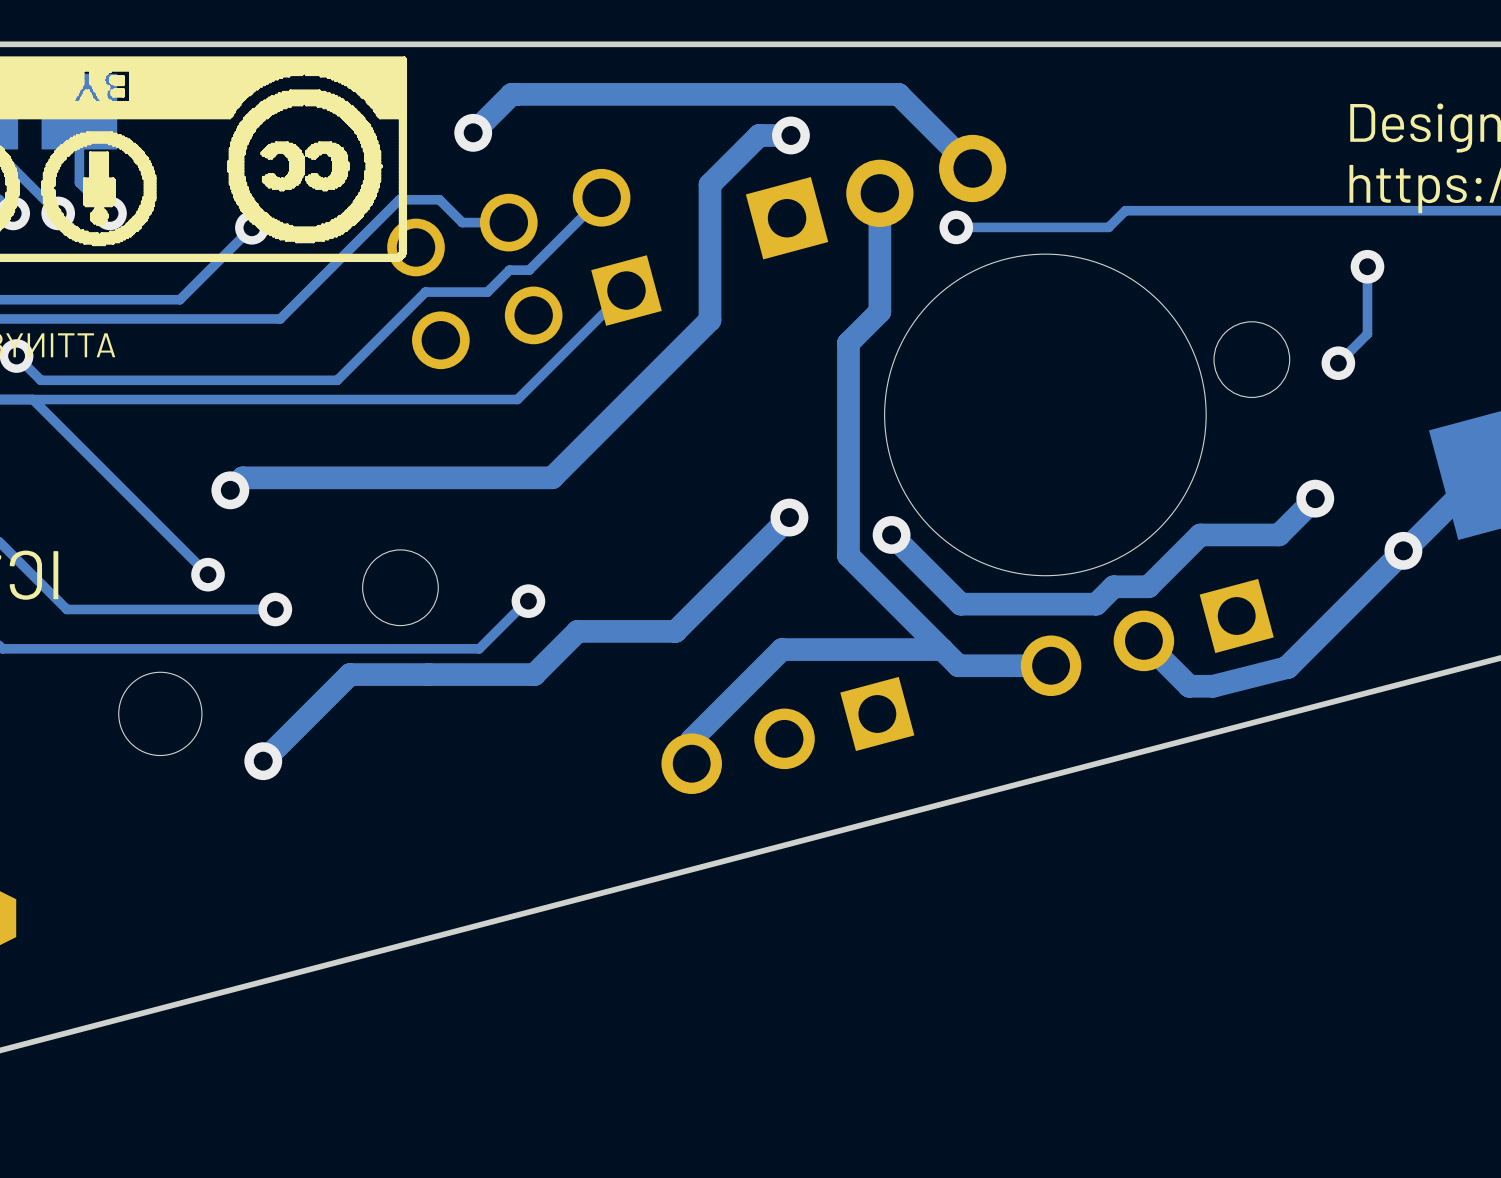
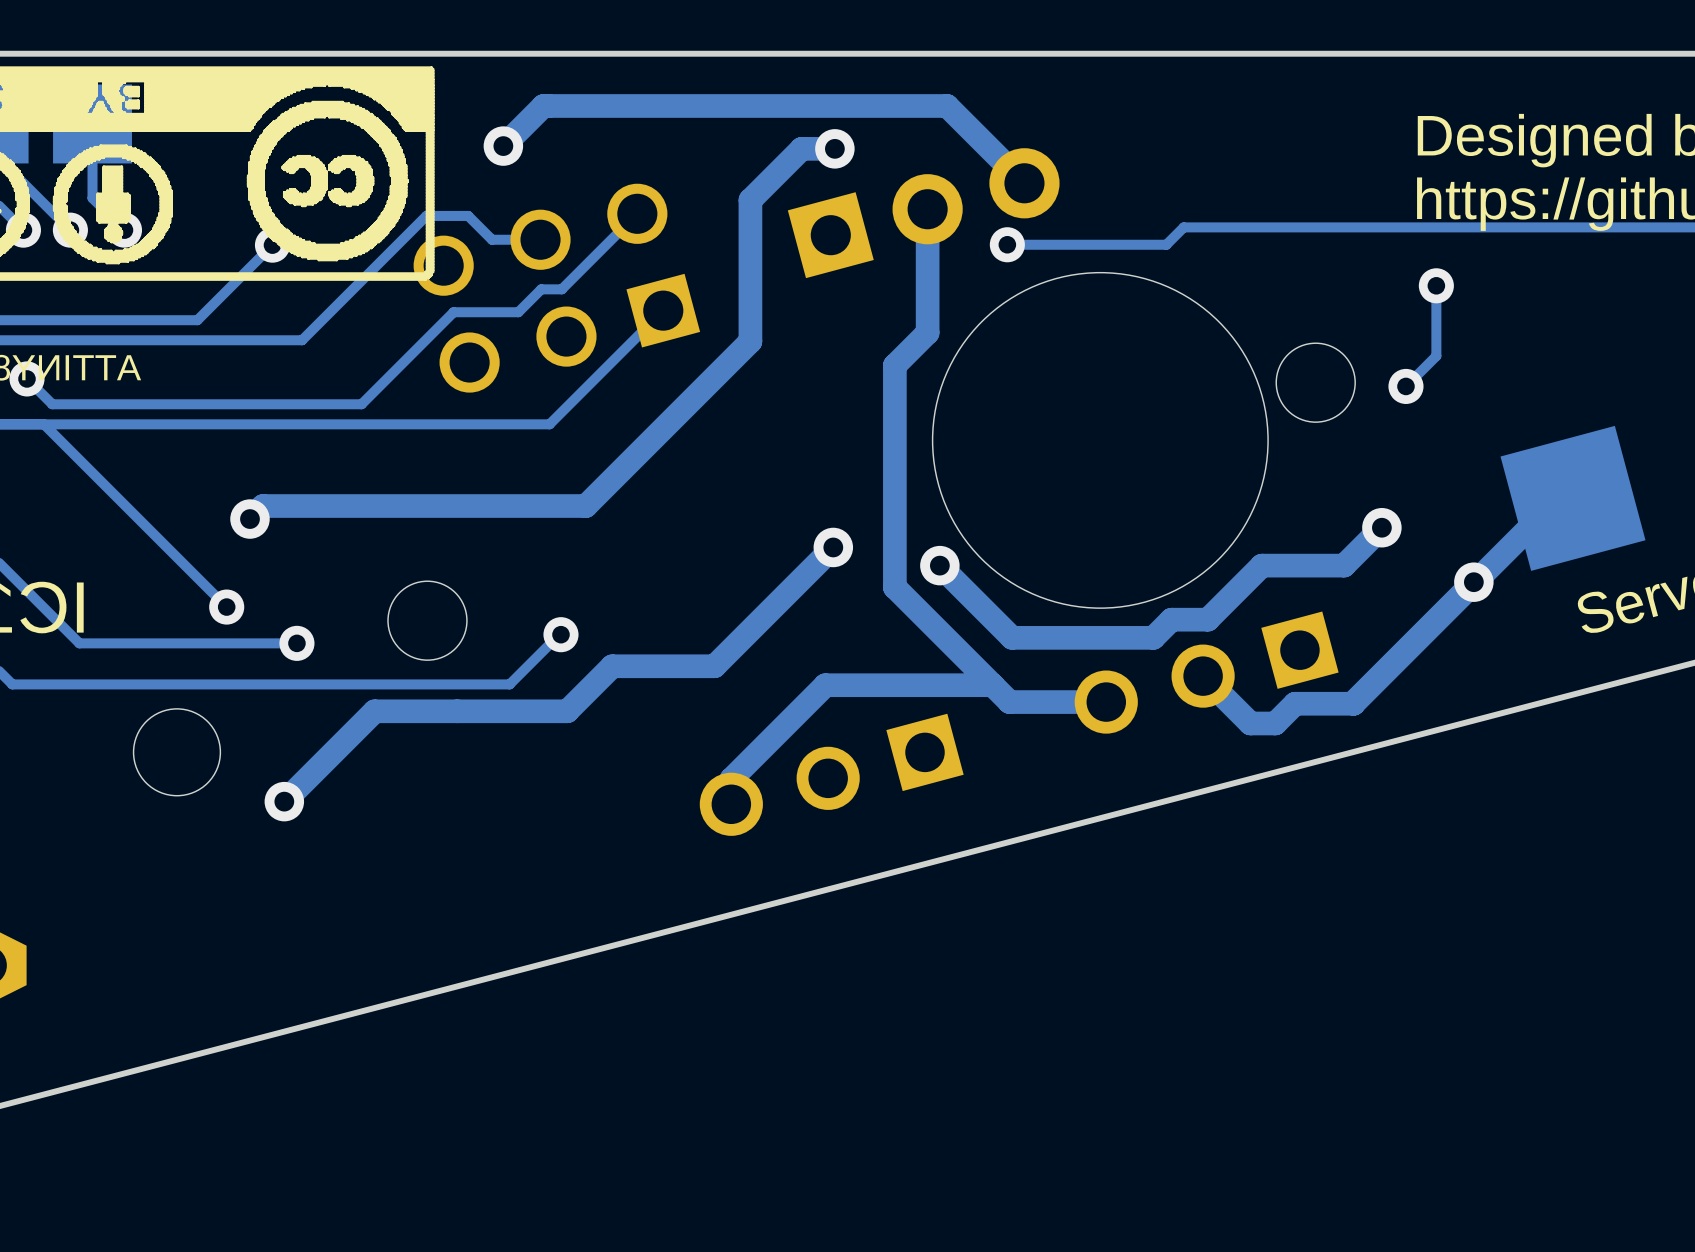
track: (1288, 667) (1213, 686) -> (1353, 703) (1295, 703) (1275, 723)

